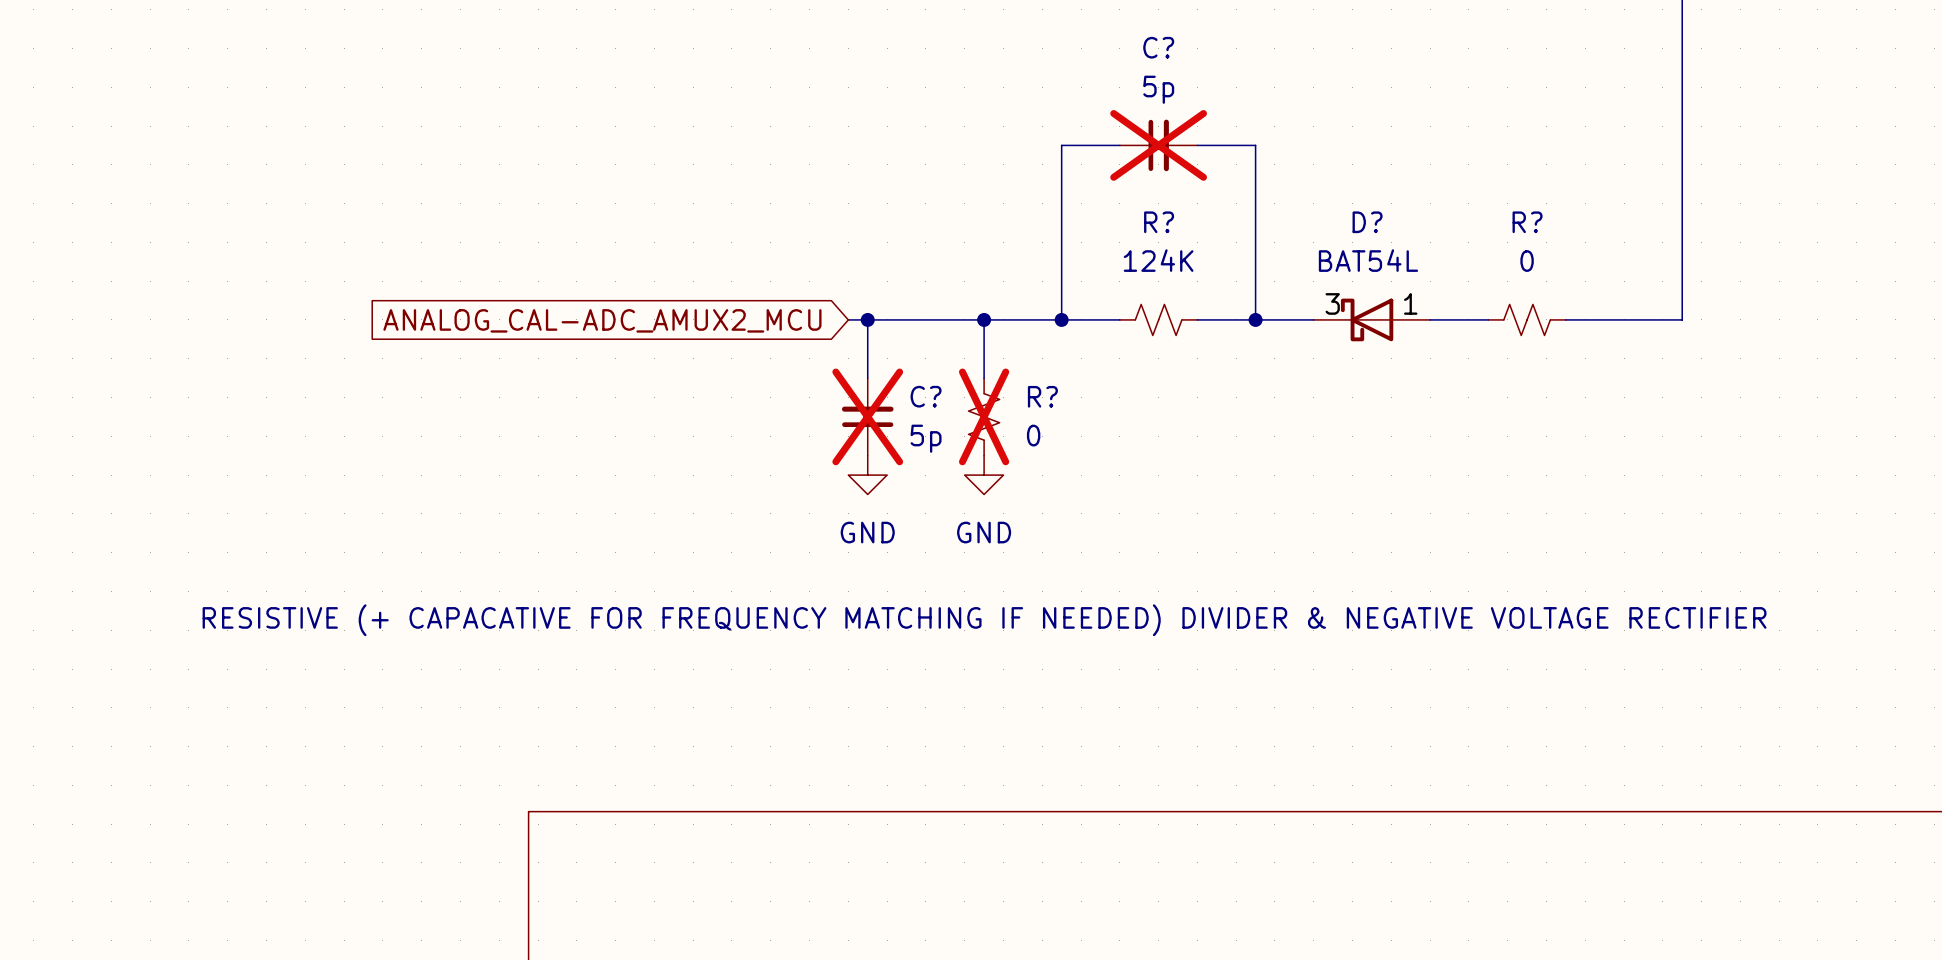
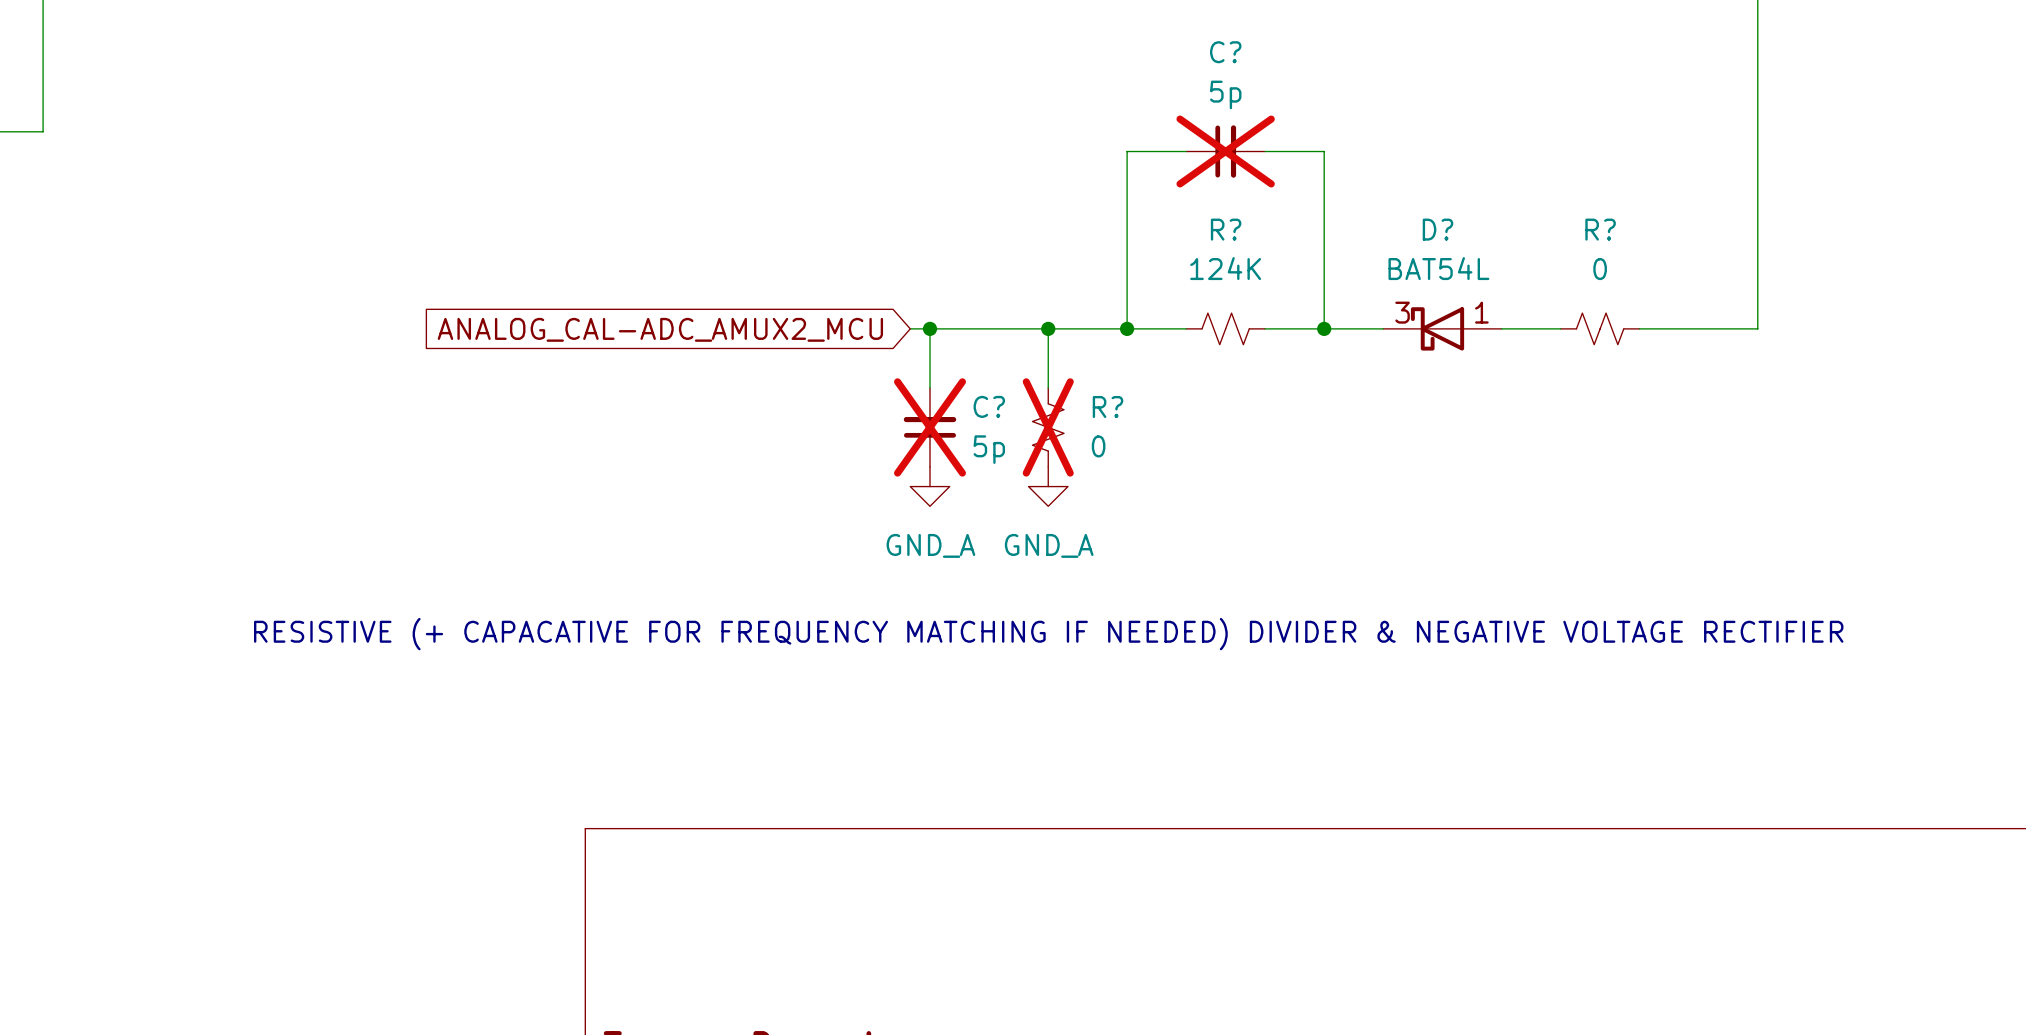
power symbol: GND (867, 475) -> GND_A (929, 486)
power symbol: GND (984, 475) -> GND_A (1048, 486)

